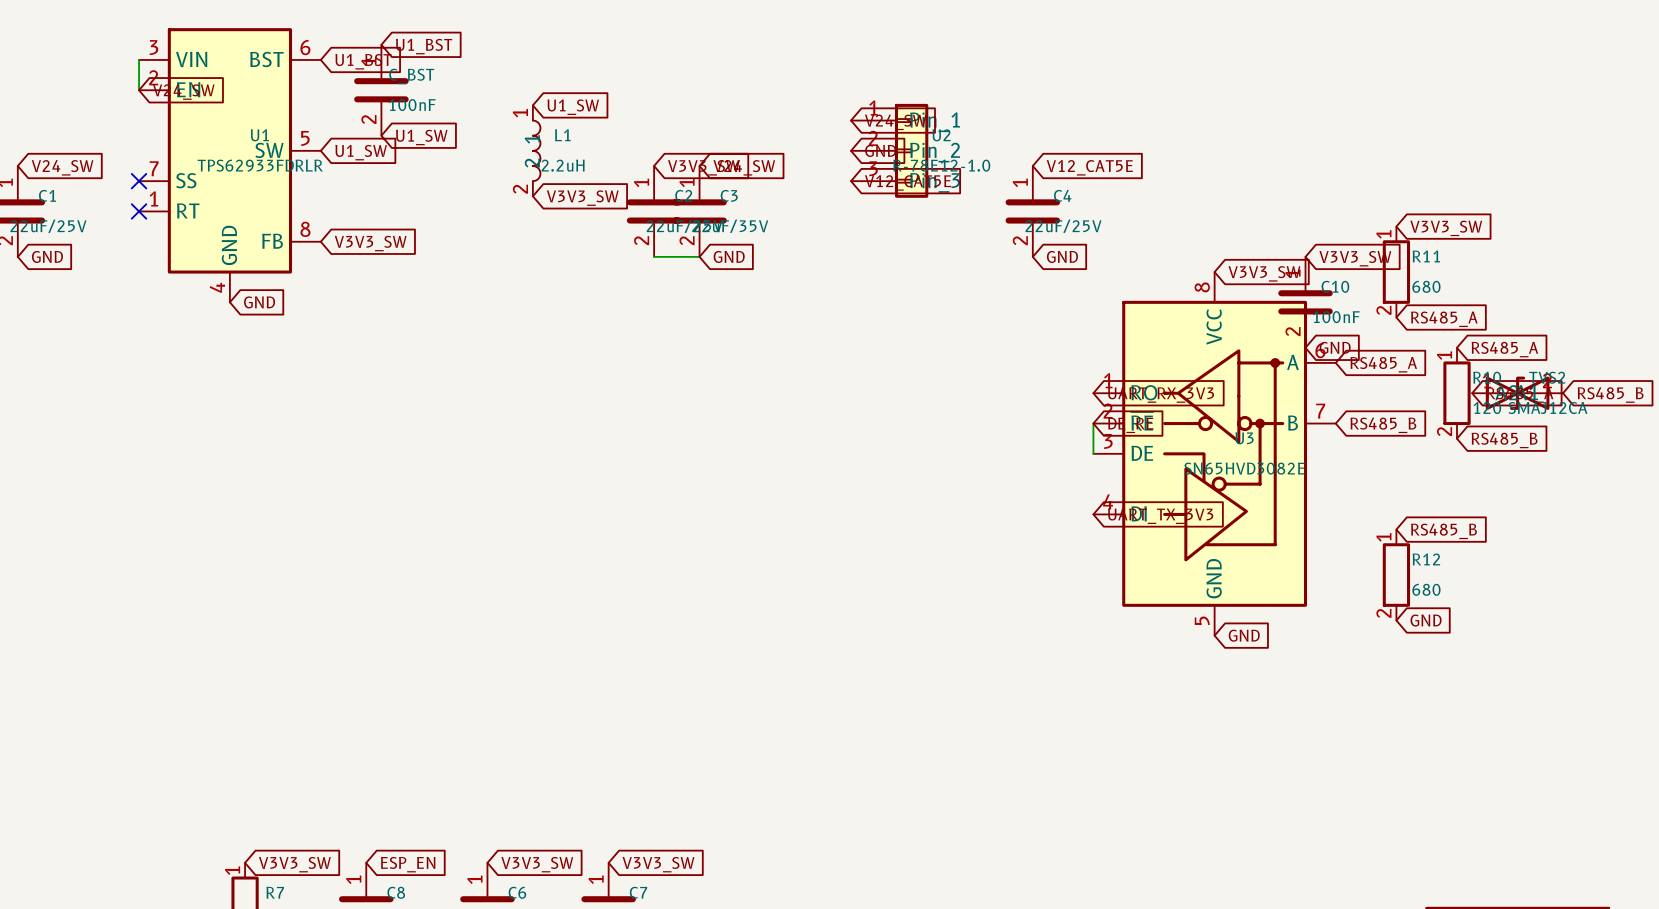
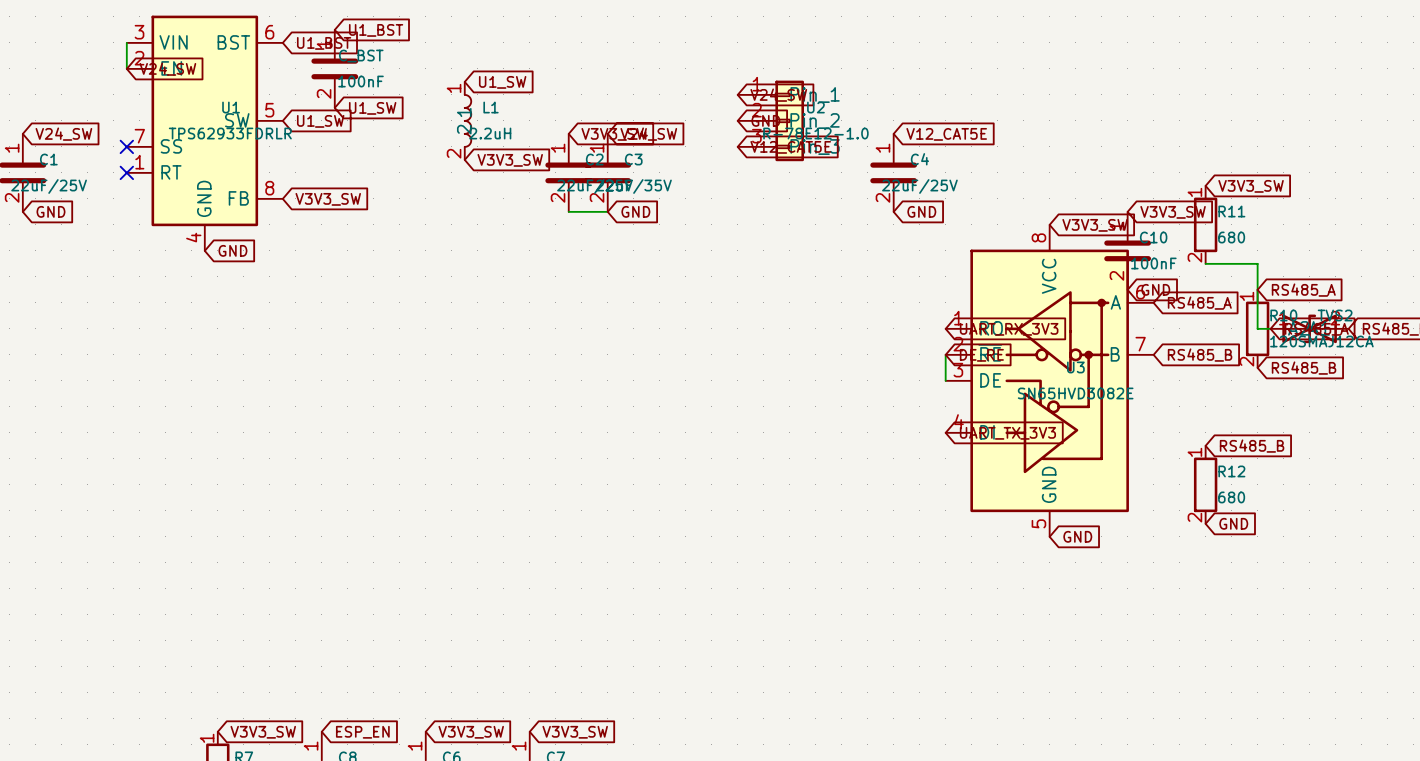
wire: none -> (1205, 263) (1257, 263) (1257, 328) (1270, 328)
global label: RS485_A (1444, 319) -> none

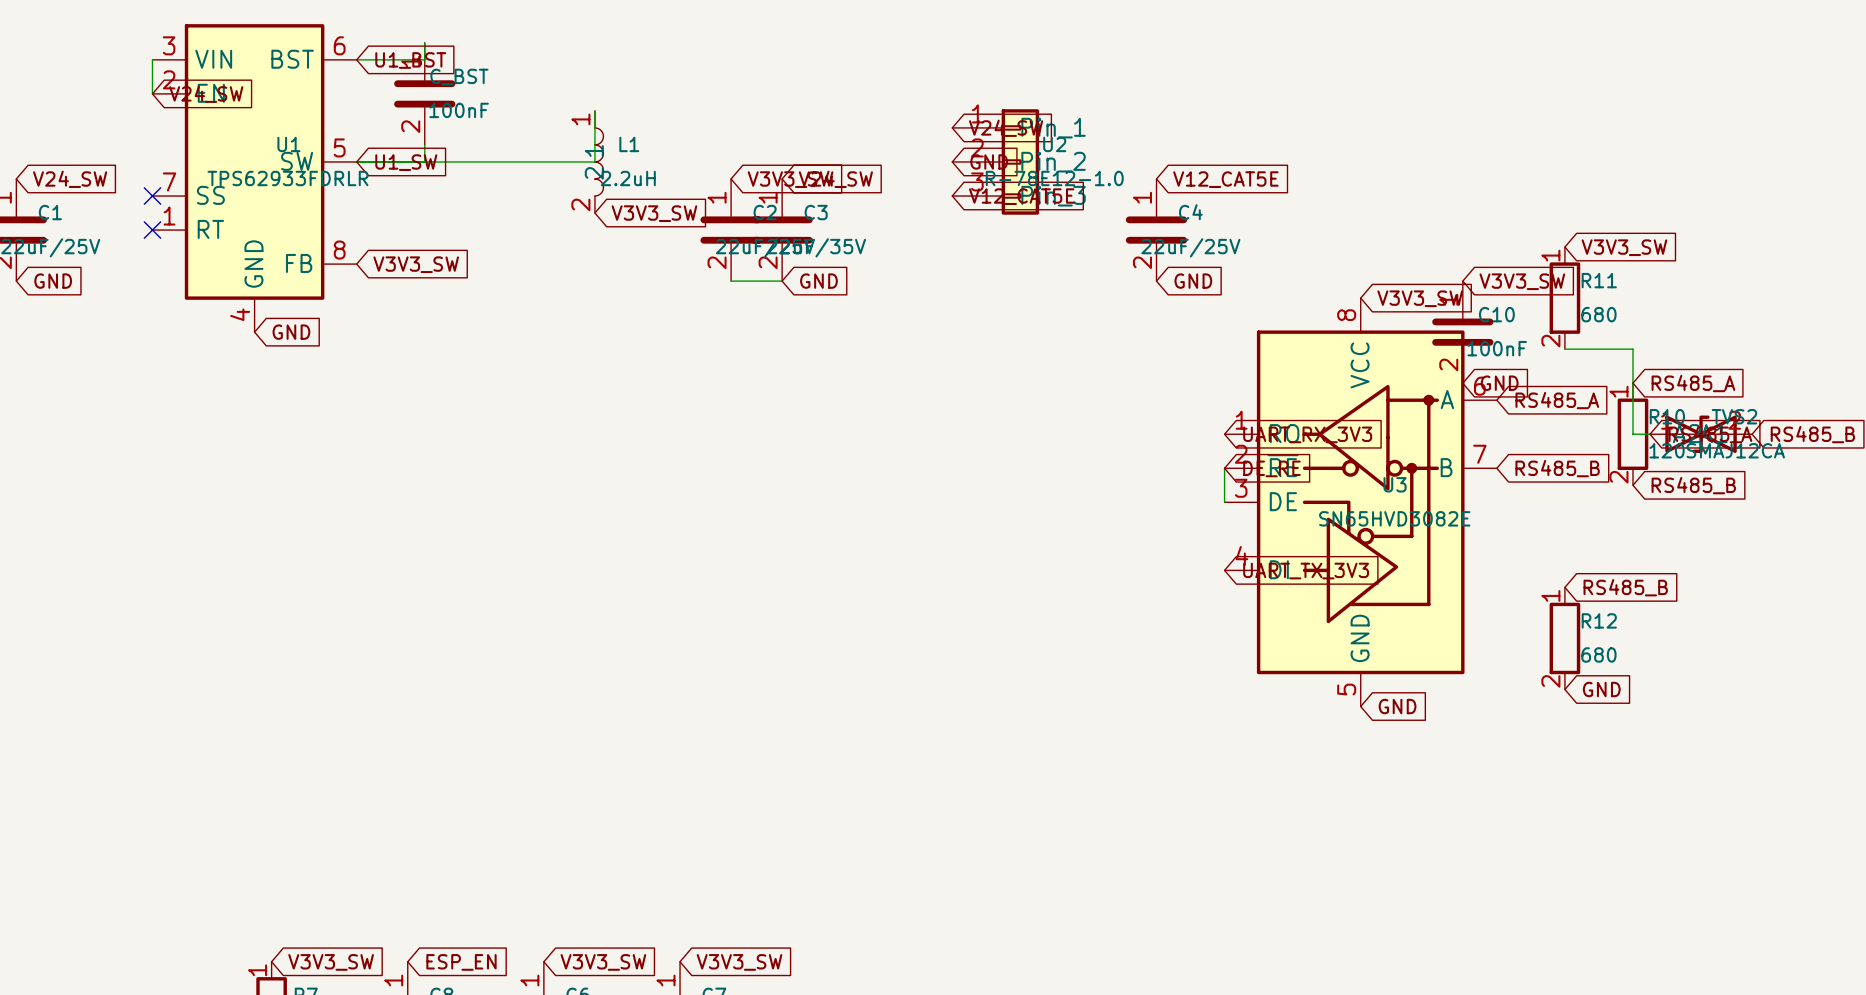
wire: none -> (424, 42) (424, 59) (356, 59)
global label: U1_BST (376, 30) -> none
wire: none -> (594, 110) (594, 161) (356, 161)
global label: U1_SW (502, 82) -> none
wire: none -> (424, 144) (424, 161)
global label: U1_SW (372, 108) -> none

